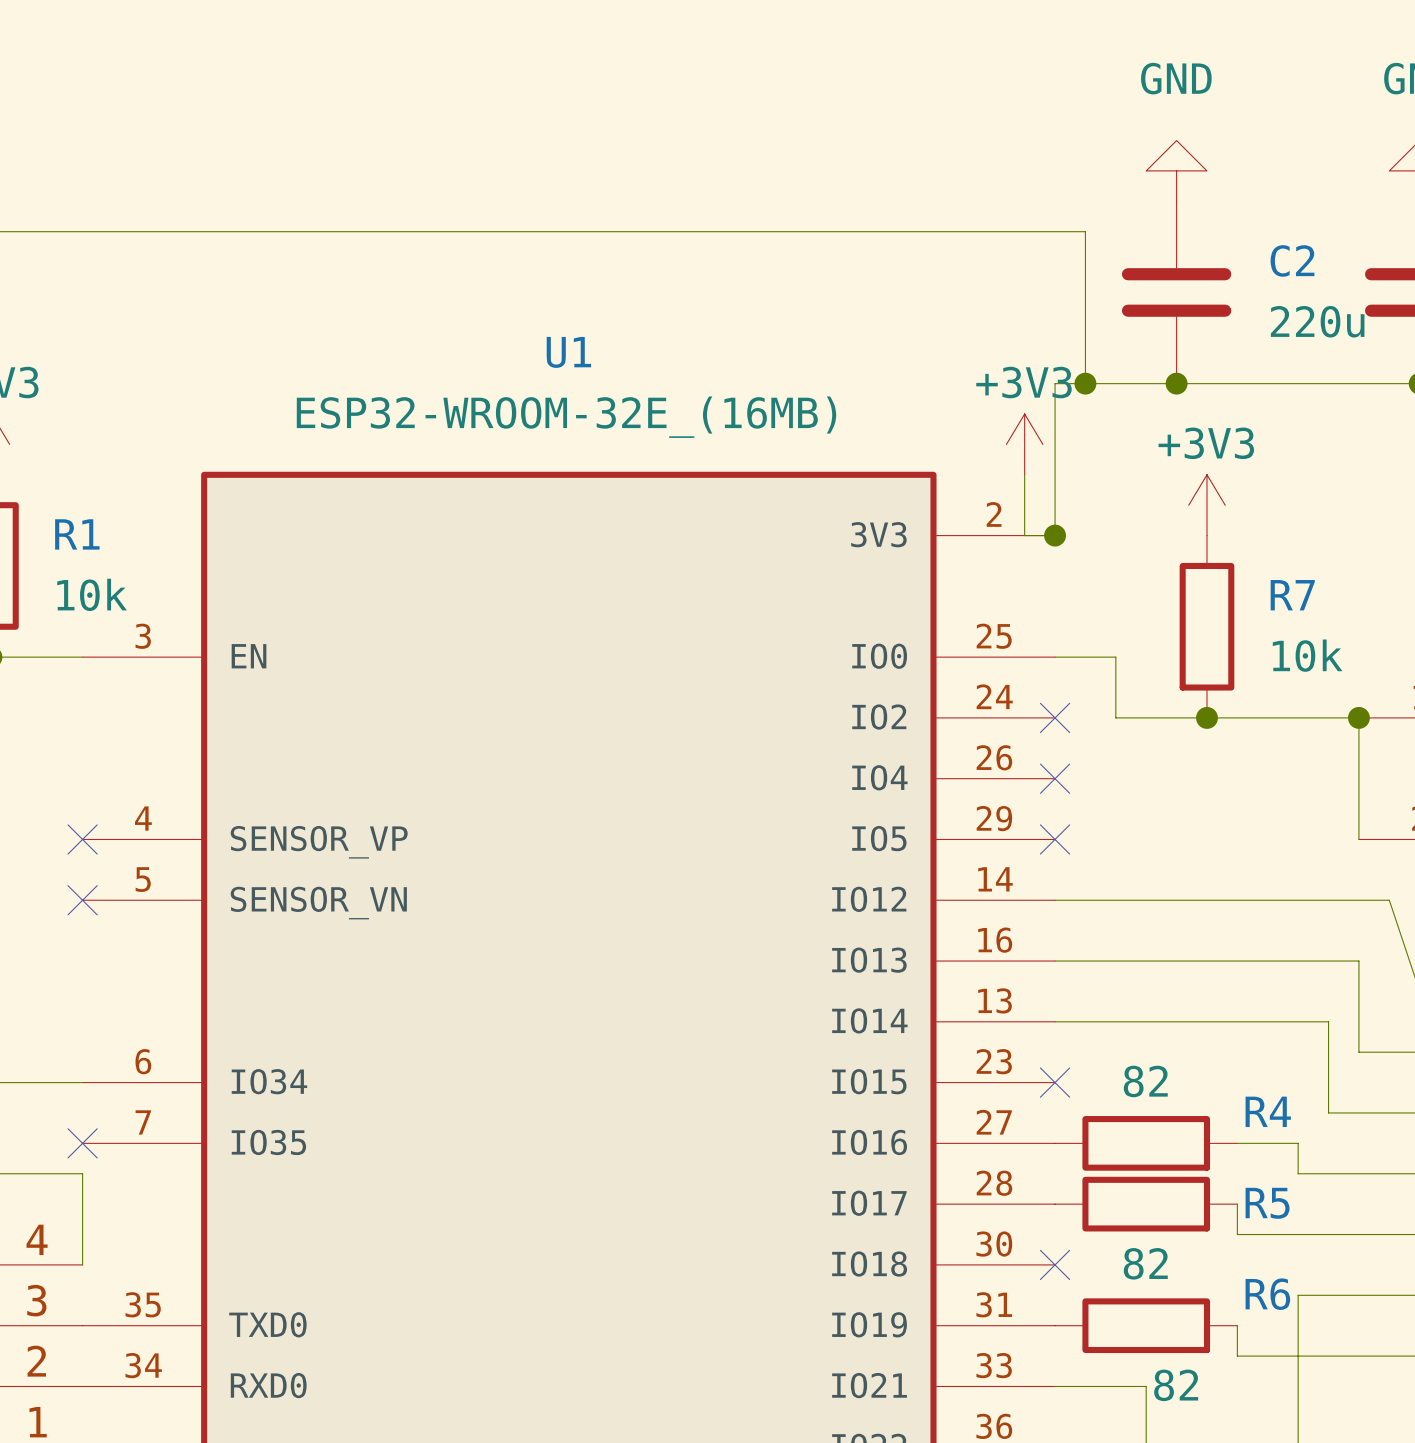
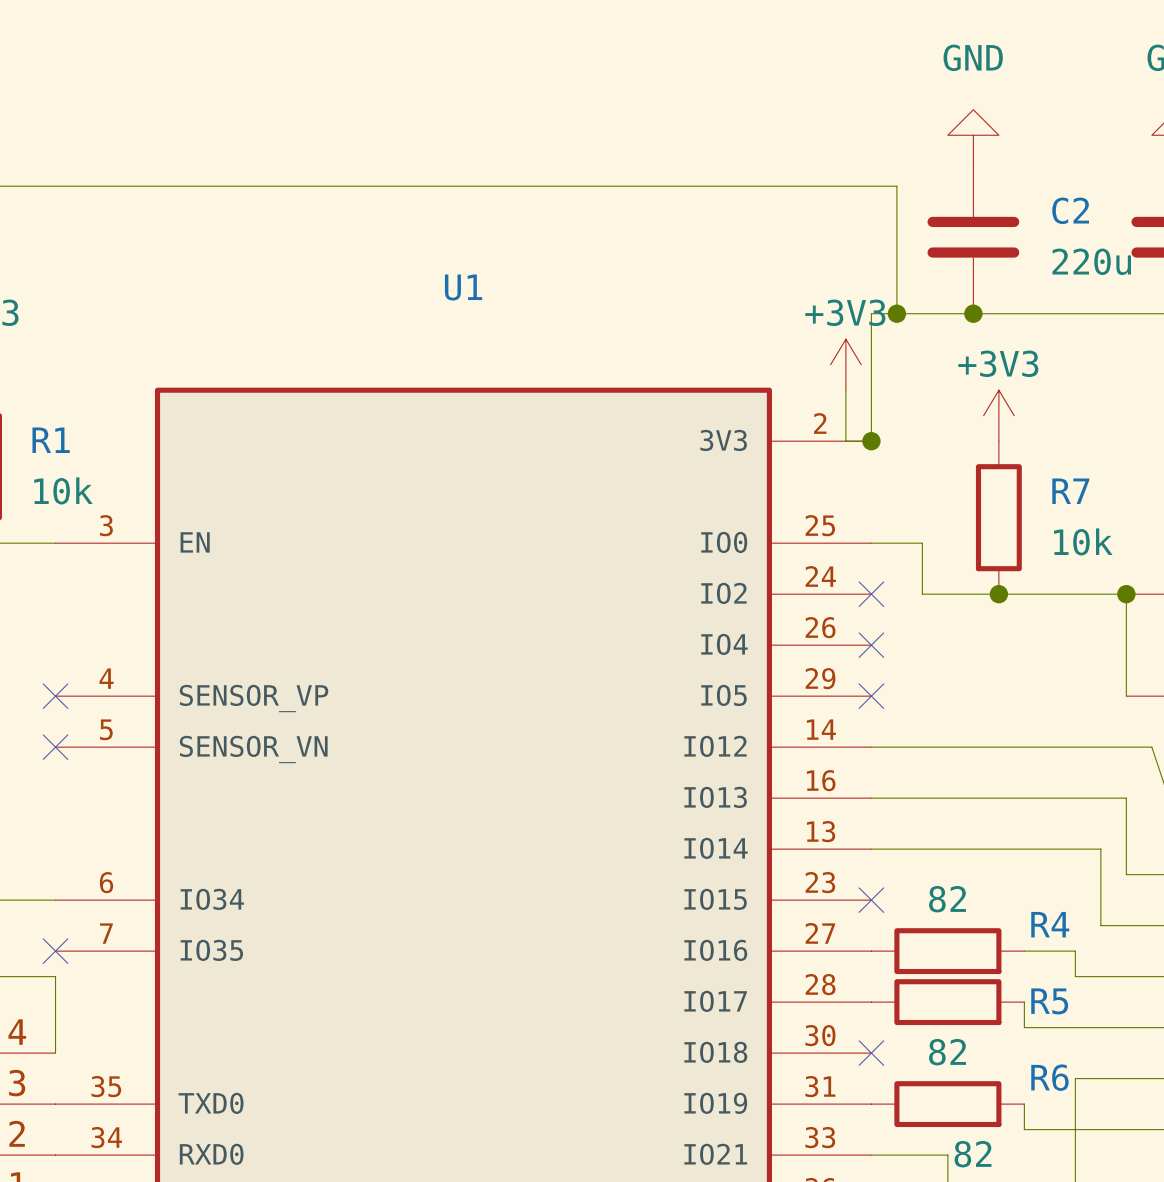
U1 value: ESP32-WROOM-32E_(16MB) (566, 417) -> none

